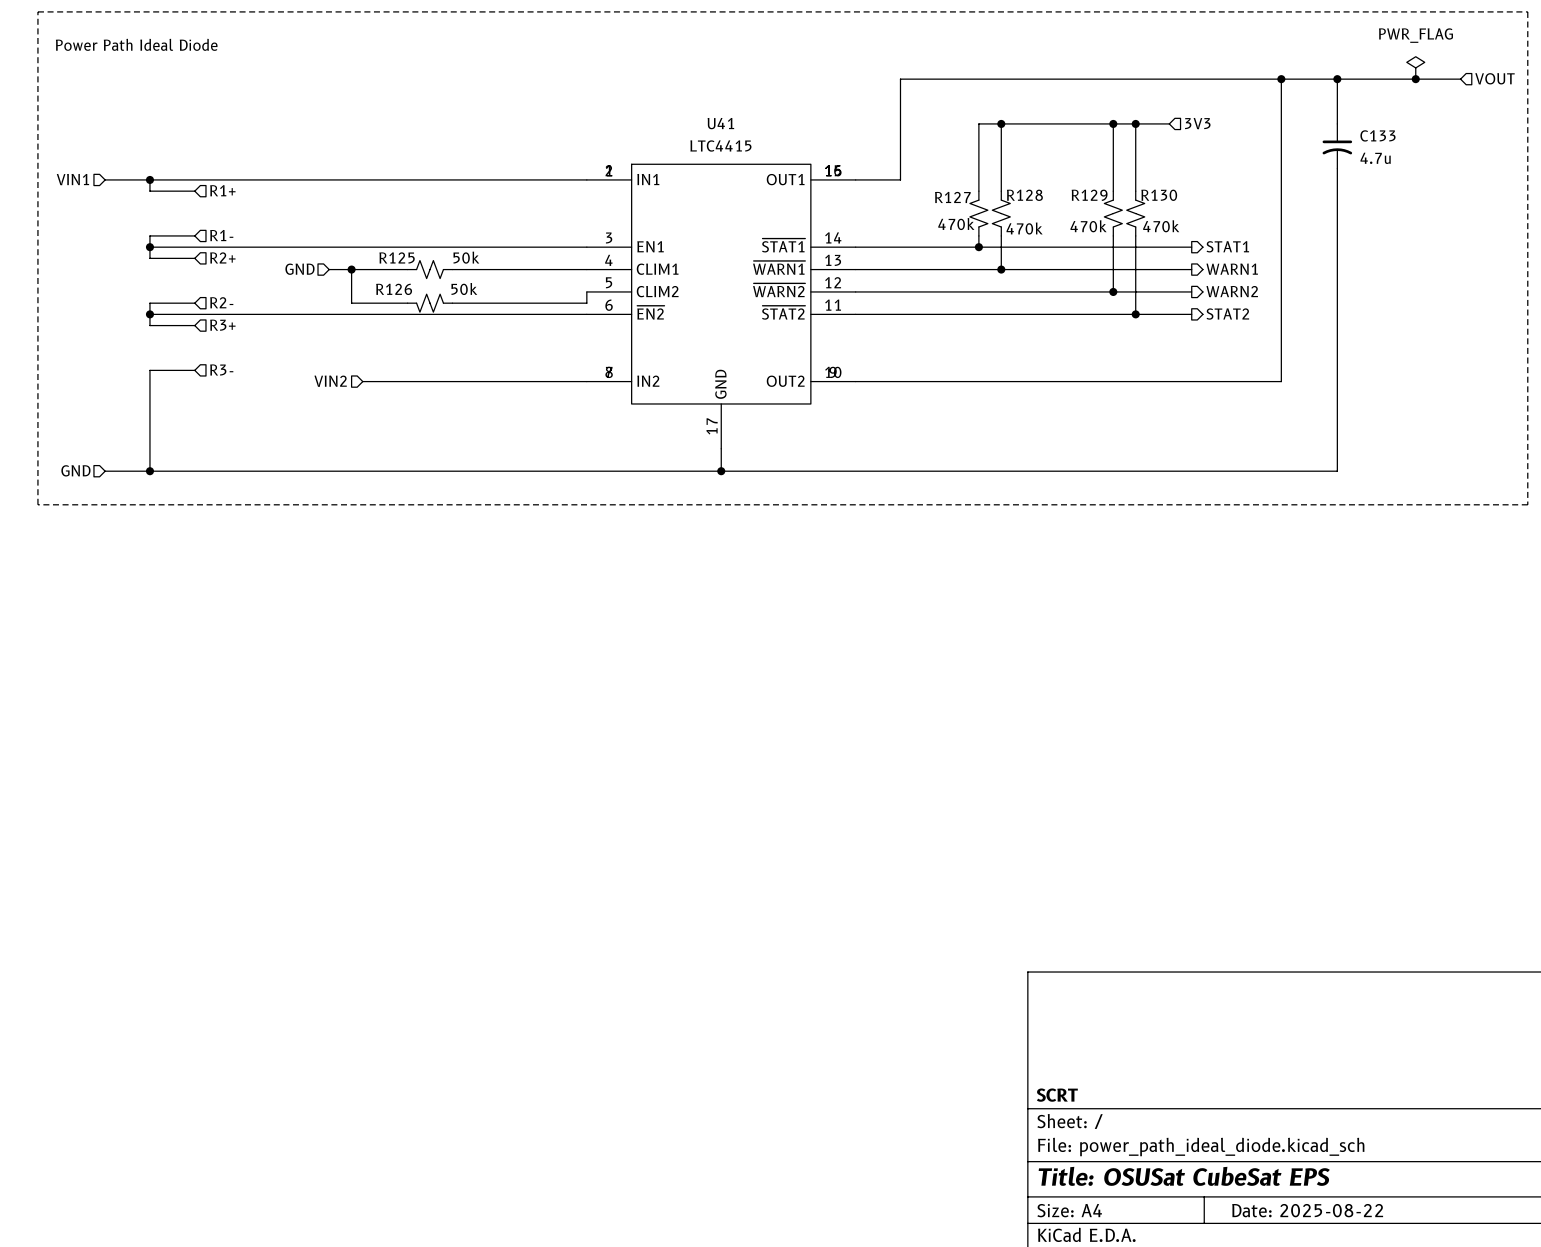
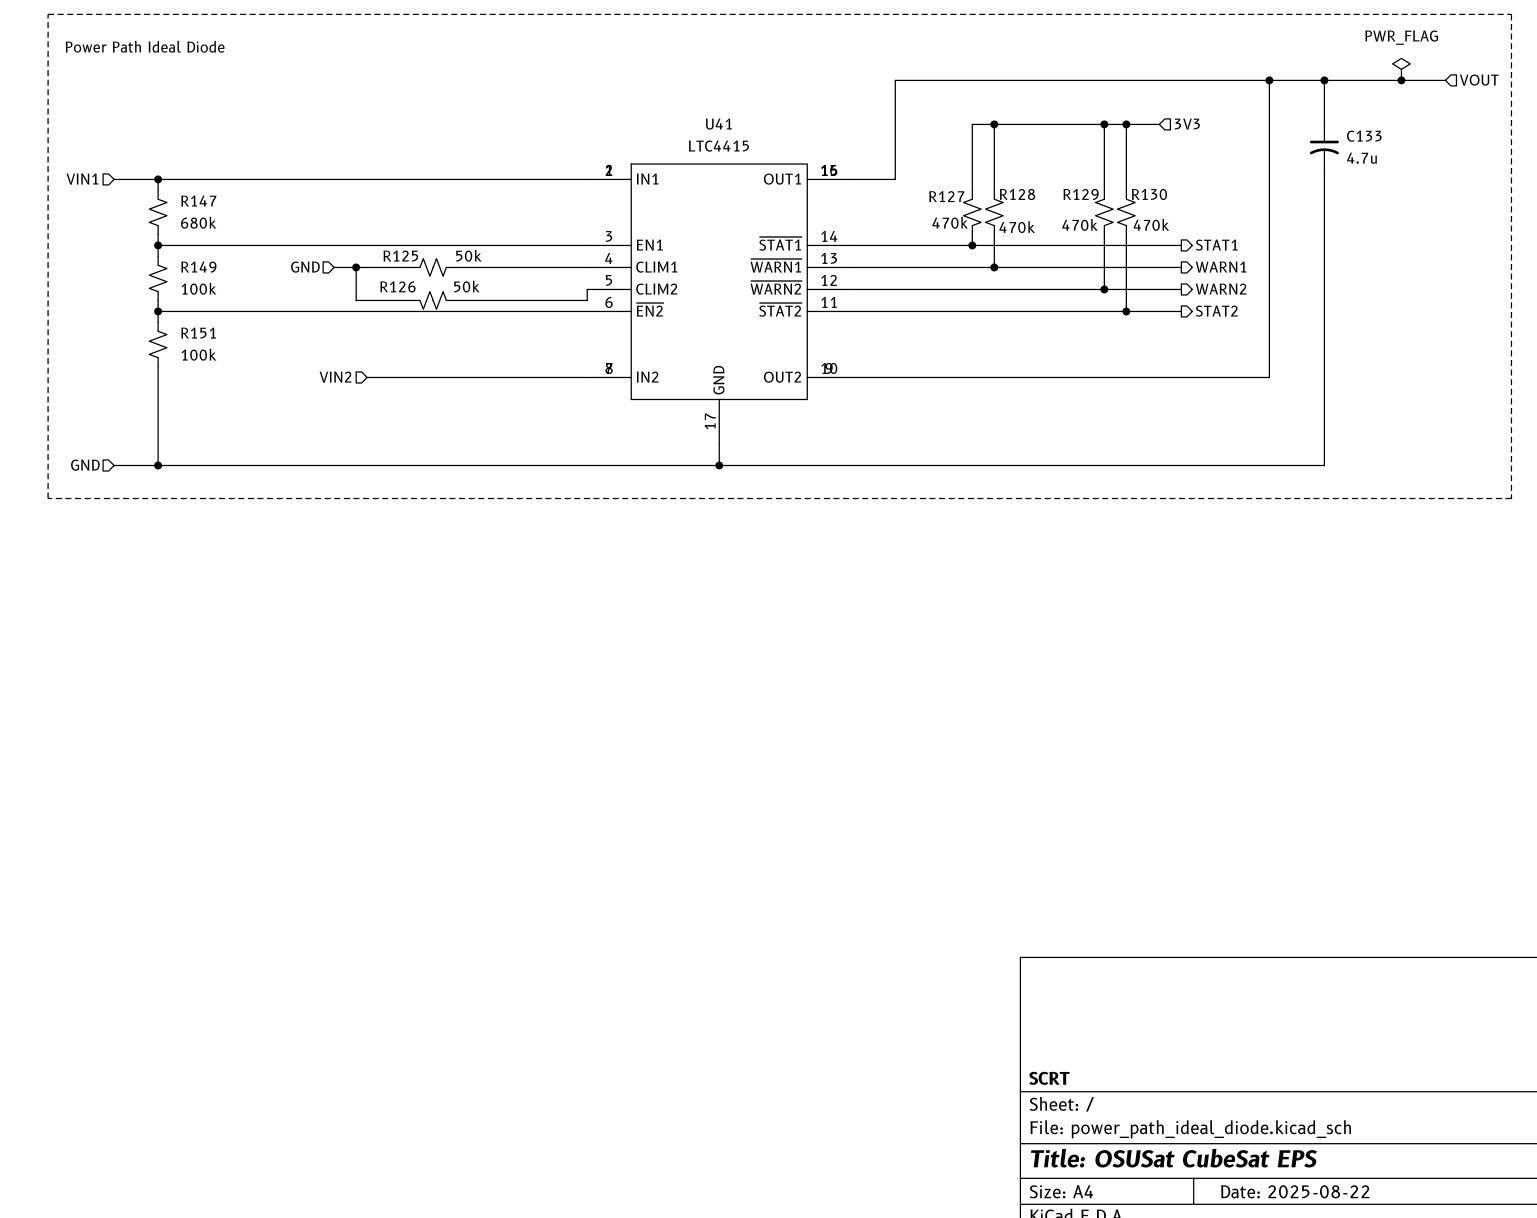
hierarchical label: R1+ (222, 190) -> none
wire: (149, 191) (194, 191) -> none
R147: none -> 680k (158, 212)
wire: (149, 235) (194, 235) -> none
hierarchical label: R1- (221, 235) -> none
hierarchical label: R2+ (222, 257) -> none
wire: (149, 258) (194, 258) -> none
R149: none -> 100k (158, 278)
hierarchical label: R2- (221, 302) -> none
wire: (149, 303) (194, 303) -> none
wire: (149, 325) (194, 325) -> none
hierarchical label: R3+ (222, 325) -> none
R151: none -> 100k (158, 344)
hierarchical label: R3- (221, 369) -> none
wire: (149, 370) (194, 370) -> none

